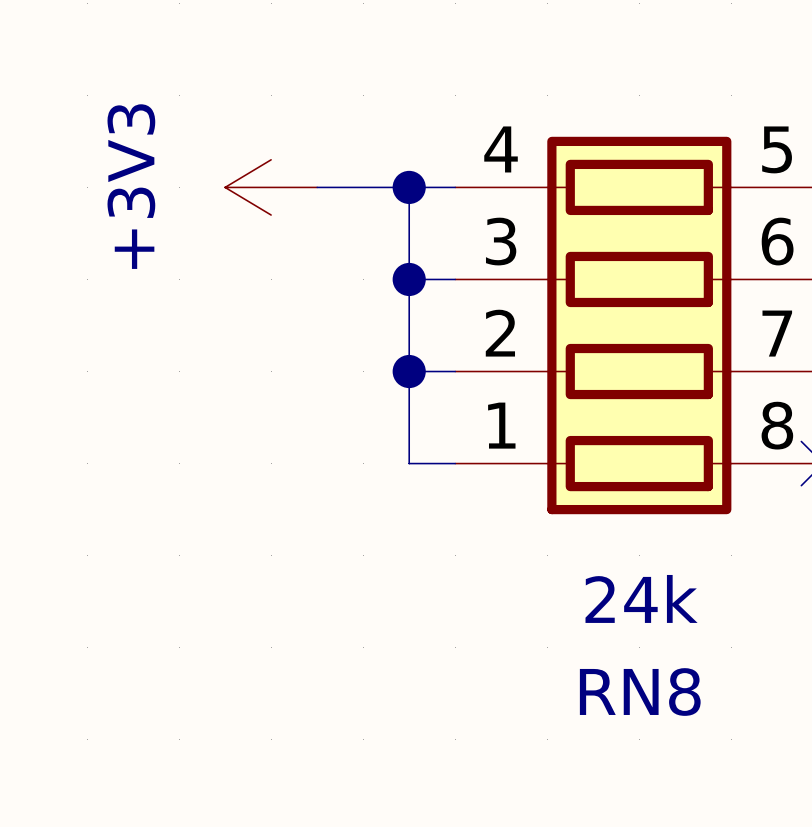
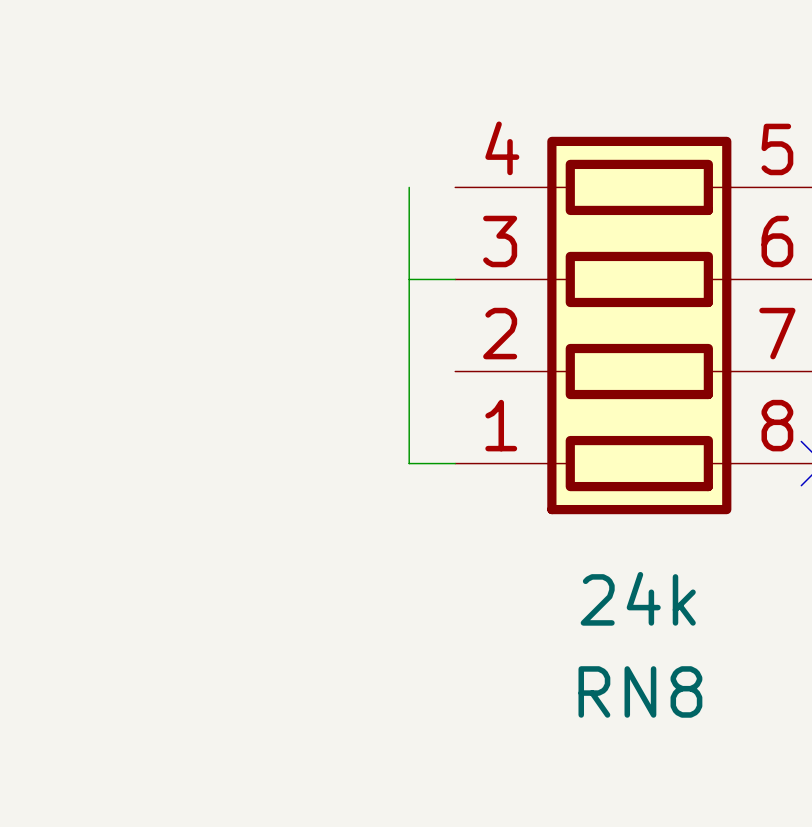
power symbol: +3V3 (271, 187) -> none
wire: (317, 187) (455, 187) -> none
junction: (409, 187) -> none
junction: (409, 279) -> none
wire: (409, 371) (455, 371) -> none
junction: (409, 371) -> none

